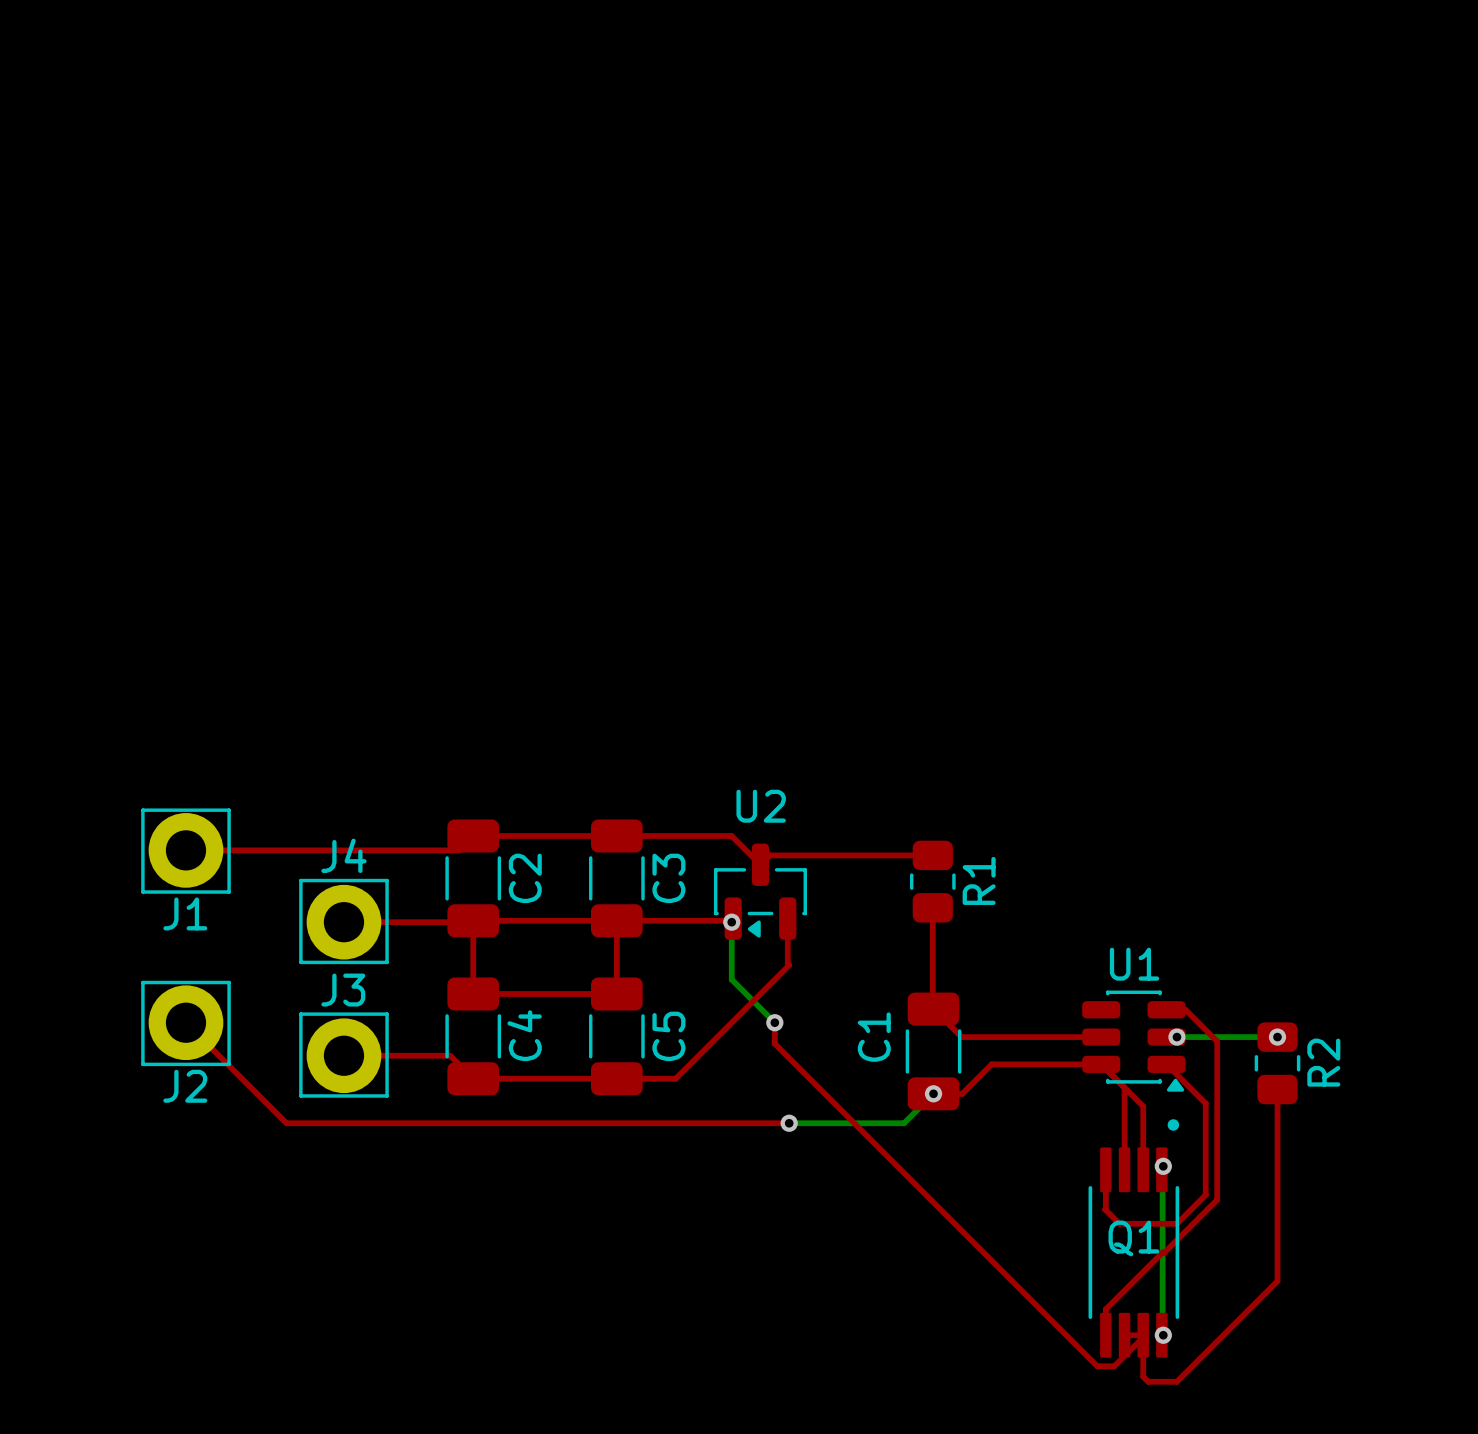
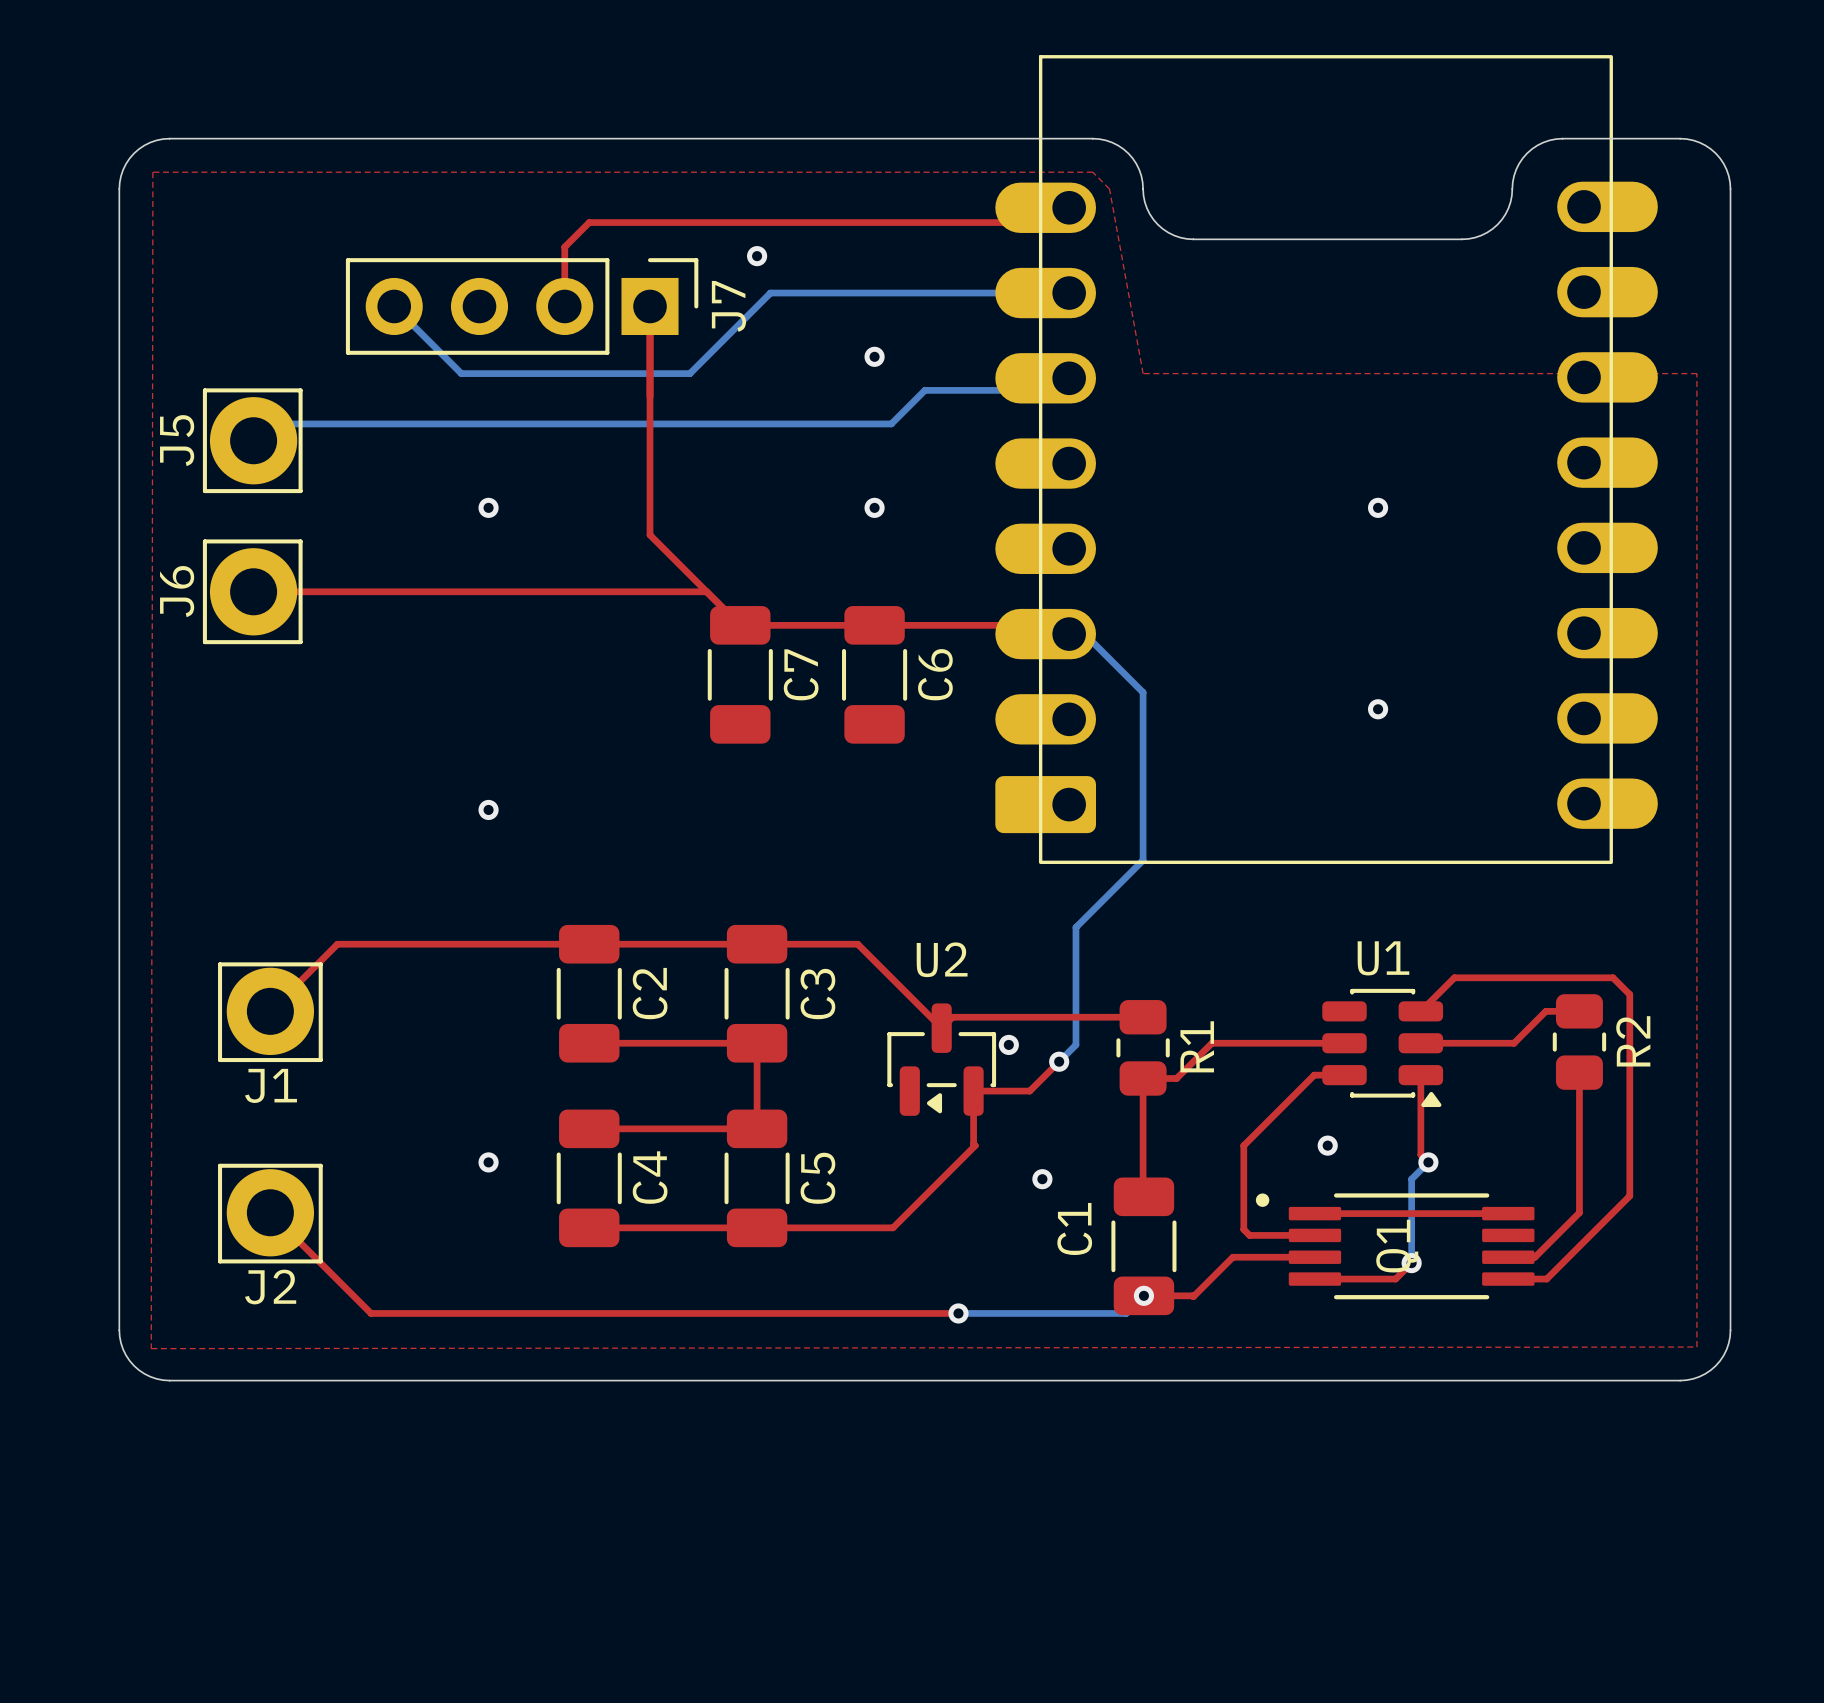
board edge: none -> (169, 138) (1099, 139) (1117, 145) (1132, 158) (1141, 175) (1146, 208) (1157, 224) (1174, 235) (1193, 239) (1468, 238) (1487, 232) (1501, 219) (1510, 202) (1514, 175) (1519, 163) (1527, 153) (1543, 142) (1562, 138) (1680, 138) (1699, 142) (1710, 149) (1723, 163) (1728, 175) (1730, 188) (1730, 1330) (1728, 1343) (1720, 1360) (1710, 1370) (1699, 1376) (1680, 1380) (169, 1380) (156, 1378) (139, 1370) (129, 1360) (123, 1349) (119, 1330) (119, 188) (123, 169) (134, 153) (150, 142) (169, 138)
top zone outline: none -> (152, 172) (151, 1348) (1696, 1347) (1696, 373) (1143, 373) (1109, 188) (1092, 172) (152, 172)
top track: none -> (1069, 207) (1054, 222) (589, 222) (564, 247) (564, 306)
via: none -> (757, 256)
bottom track: none -> (1069, 293) (770, 293) (689, 373) (461, 373) (394, 306)
J7: none -> (522, 306)
top track: none -> (650, 306) (650, 535) (740, 625) (1060, 625) (1069, 634)
via: none -> (874, 356)
bottom track: none -> (1069, 378) (1057, 390) (924, 390) (891, 423) (270, 423) (253, 440)
J5: none -> (252, 440)
part: none -> (1326, 459)
via: none -> (488, 507)
via: none -> (874, 507)
via: none -> (1378, 507)
J6: none -> (252, 591)
top track: none -> (253, 591) (706, 591)
bottom track: none -> (1069, 634) (1084, 634) (1143, 692) (1143, 860) (1075, 927) (1075, 1044) (1059, 1061)
C7: none -> (740, 674)
C6: none -> (874, 674)
via: none -> (1378, 709)
via: none -> (488, 809)
top track: (731, 836) (473, 836) (458, 850) (185, 850) -> (908, 994) (857, 944) (337, 944) (270, 1011)
top track: none -> (1420, 1011) (1454, 977) (1613, 977) (1629, 994) (1629, 1195) (1546, 1279) (1508, 1279)
top track: none -> (1579, 1011) (1545, 1011) (1514, 1043) (1420, 1043)
top track: none -> (589, 1043) (757, 1043) (757, 1128) (589, 1128)
top track: none -> (1344, 1043) (1211, 1043) (1176, 1078) (1143, 1078)
C2 position: (473, 878) -> (589, 993)
C3 position: (616, 878) -> (757, 993)
via: none -> (1008, 1044)
top track: none -> (1059, 1061) (1029, 1091) (973, 1091)
via: none -> (1059, 1061)
top track: none -> (1579, 1072) (1579, 1212) (1534, 1257) (1508, 1257)
top track: none -> (1344, 1075) (1314, 1075) (1243, 1145) (1243, 1229) (1249, 1235) (1314, 1235)
top track: none -> (1420, 1075) (1420, 1154) (1428, 1162)
top track: (733, 918) (731, 920) (473, 920) -> none
top track: (473, 920) (473, 994) (616, 994) (616, 920) -> none
top track: (473, 920) (343, 922) -> none
bottom track: (731, 920) (731, 979) (774, 1022) -> none
J4: (343, 921) -> none
via: (731, 922) -> none
via: none -> (1327, 1145)
via: none -> (488, 1162)
bottom track: none -> (1428, 1162) (1411, 1179) (1411, 1263)
via: none -> (1428, 1162)
via: none -> (1042, 1179)
top track: (933, 1009) (961, 1037) (1101, 1037) -> none
top track: (1166, 1009) (1185, 1009) (1217, 1041) (1217, 1199) (1105, 1309) (1105, 1335) -> none
top track: (774, 1022) (774, 1043) (1097, 1366) (1114, 1366) (1143, 1337) -> none
via: (774, 1022) -> none
top track: none -> (1314, 1213) (1508, 1213)
top track: (718, 1035) (675, 1078) (473, 1078) (450, 1055) (343, 1055) -> (893, 1227) (589, 1227)
C4 position: (473, 1036) -> (589, 1178)
C5 position: (616, 1036) -> (757, 1178)
bottom track: (1176, 1037) (1277, 1037) -> none
via: (1176, 1037) -> none
via: (1277, 1037) -> none
U1 position: (1133, 1041) -> (1382, 1047)
J3: (343, 1055) -> none
R2 position: (1277, 1063) -> (1579, 1041)
top track: (1166, 1064) (1205, 1103) (1205, 1195) (1176, 1223) (1119, 1223) (1105, 1209) (1105, 1169) -> none
top track: none -> (1411, 1263) (1395, 1279) (1314, 1279)
via: none -> (1411, 1263)
top track: (1124, 1087) (1124, 1169) -> none
top track: (1277, 1089) (1277, 1281) (1176, 1381) (1148, 1381) (1143, 1376) (1143, 1335) (1124, 1335) -> none
top track: (962, 1093) (991, 1064) (1101, 1064) (1143, 1106) (1143, 1169) -> (1177, 1295) (1193, 1296) (1232, 1257) (1314, 1257)
top track: (272, 1108) (286, 1123) (789, 1123) -> (371, 1313) (958, 1313)
bottom track: (918, 1108) (904, 1123) (789, 1123) -> (1126, 1313) (958, 1313)
via position: (789, 1123) -> (958, 1313)
bottom track: (1163, 1166) (1163, 1335) -> none
via: (1163, 1166) -> none
Q1 rotation: 0° (1133, 1238) -> 90° counterclockwise (1395, 1246)
Q1 position: (1133, 1238) -> (1395, 1246)
via: (1163, 1335) -> none

